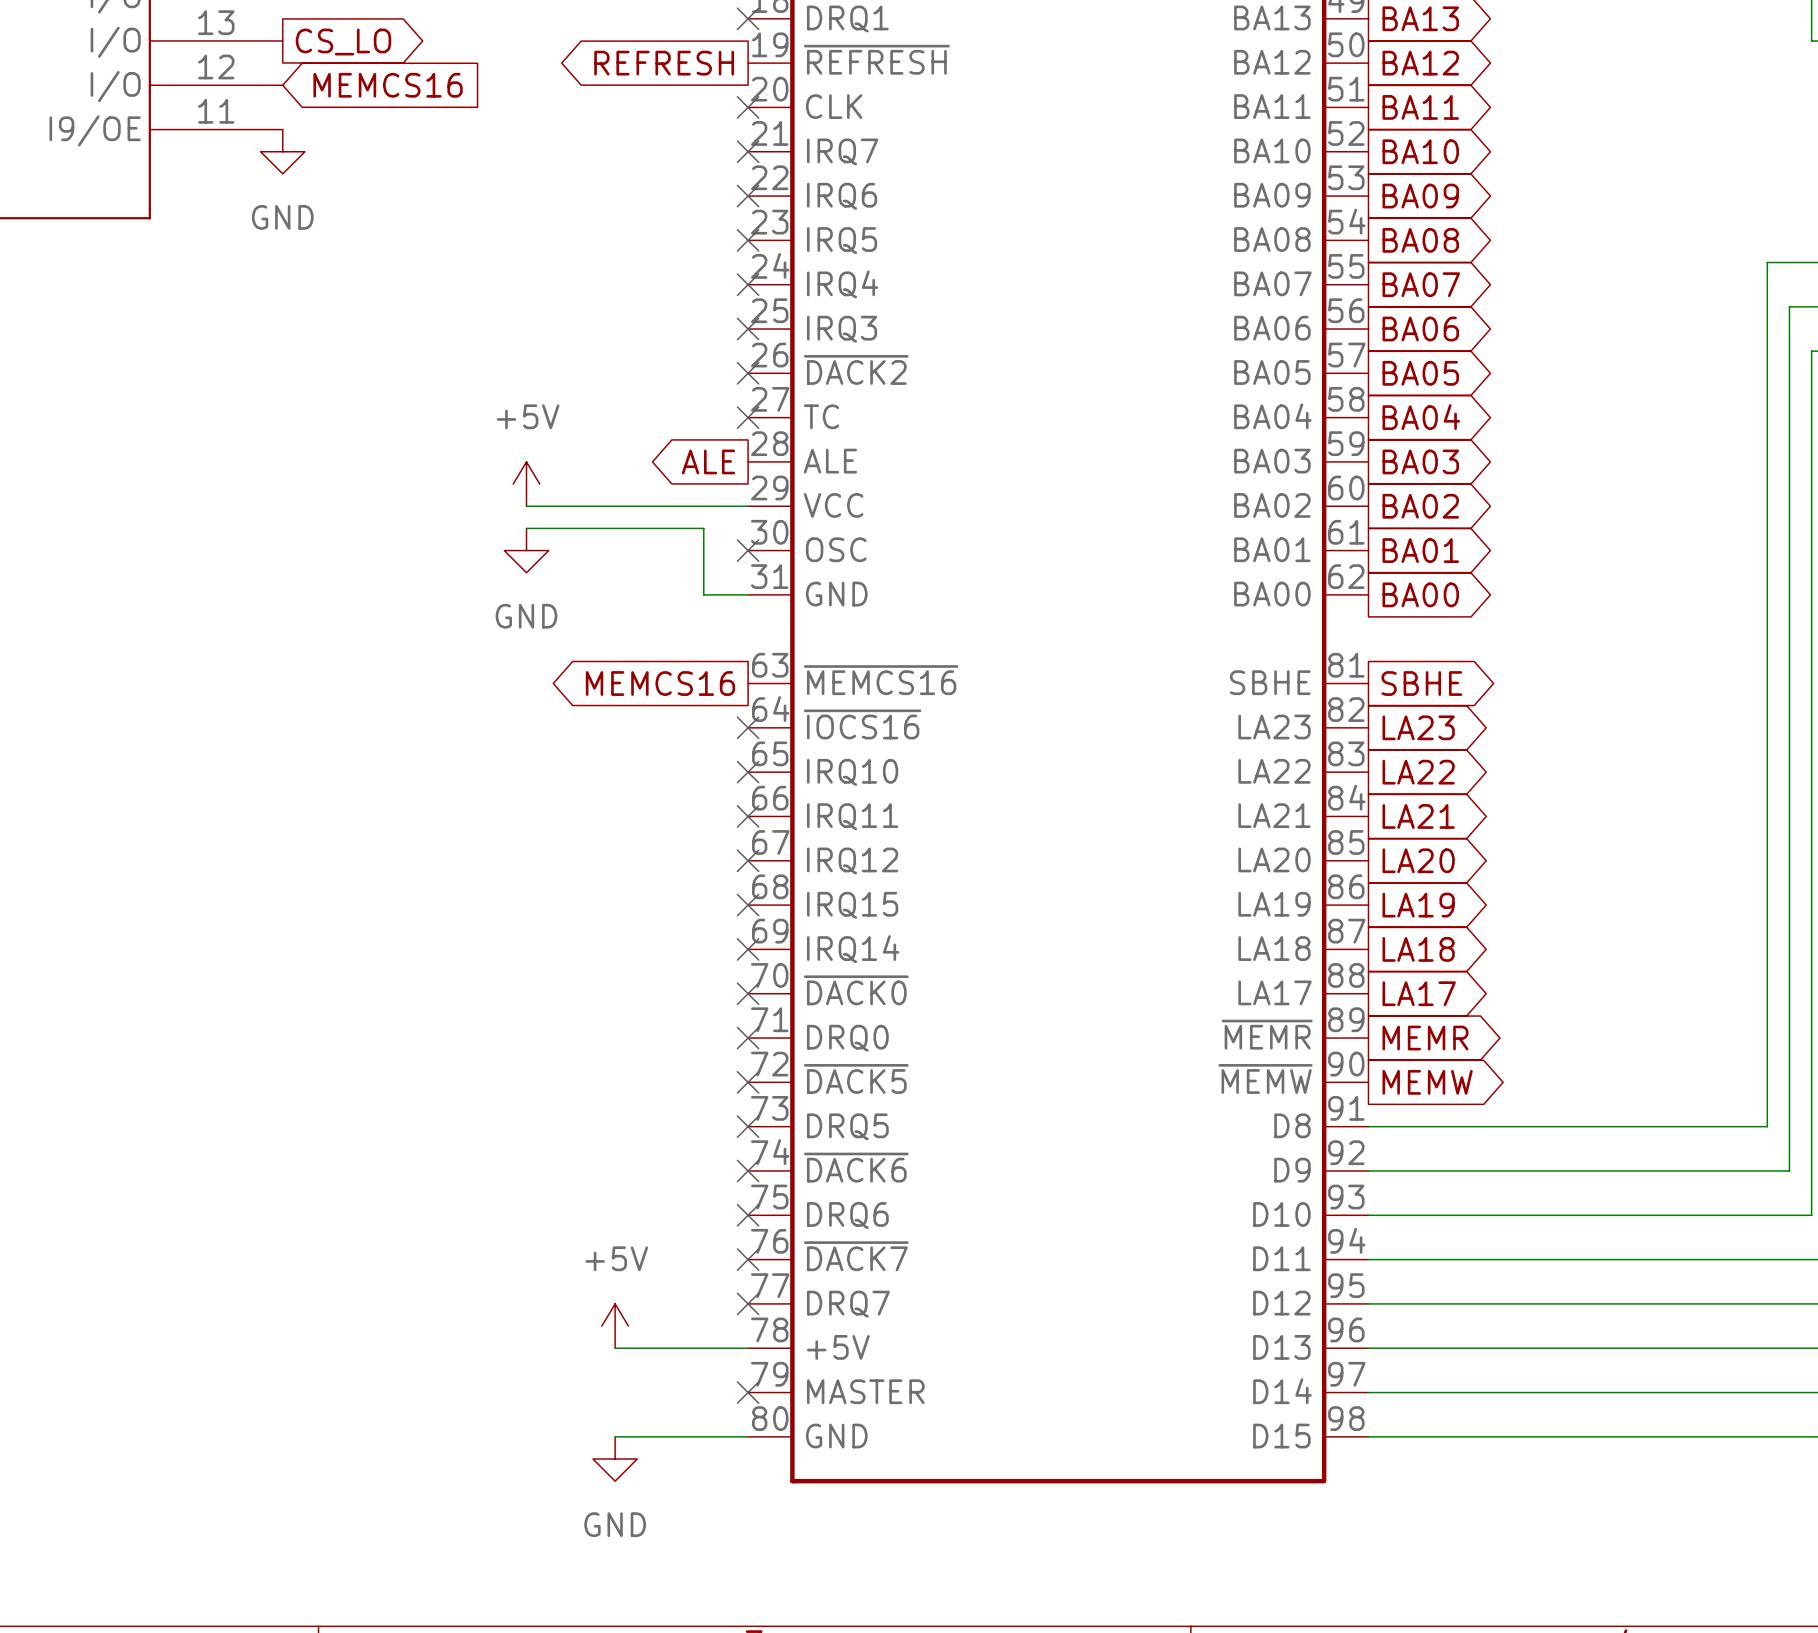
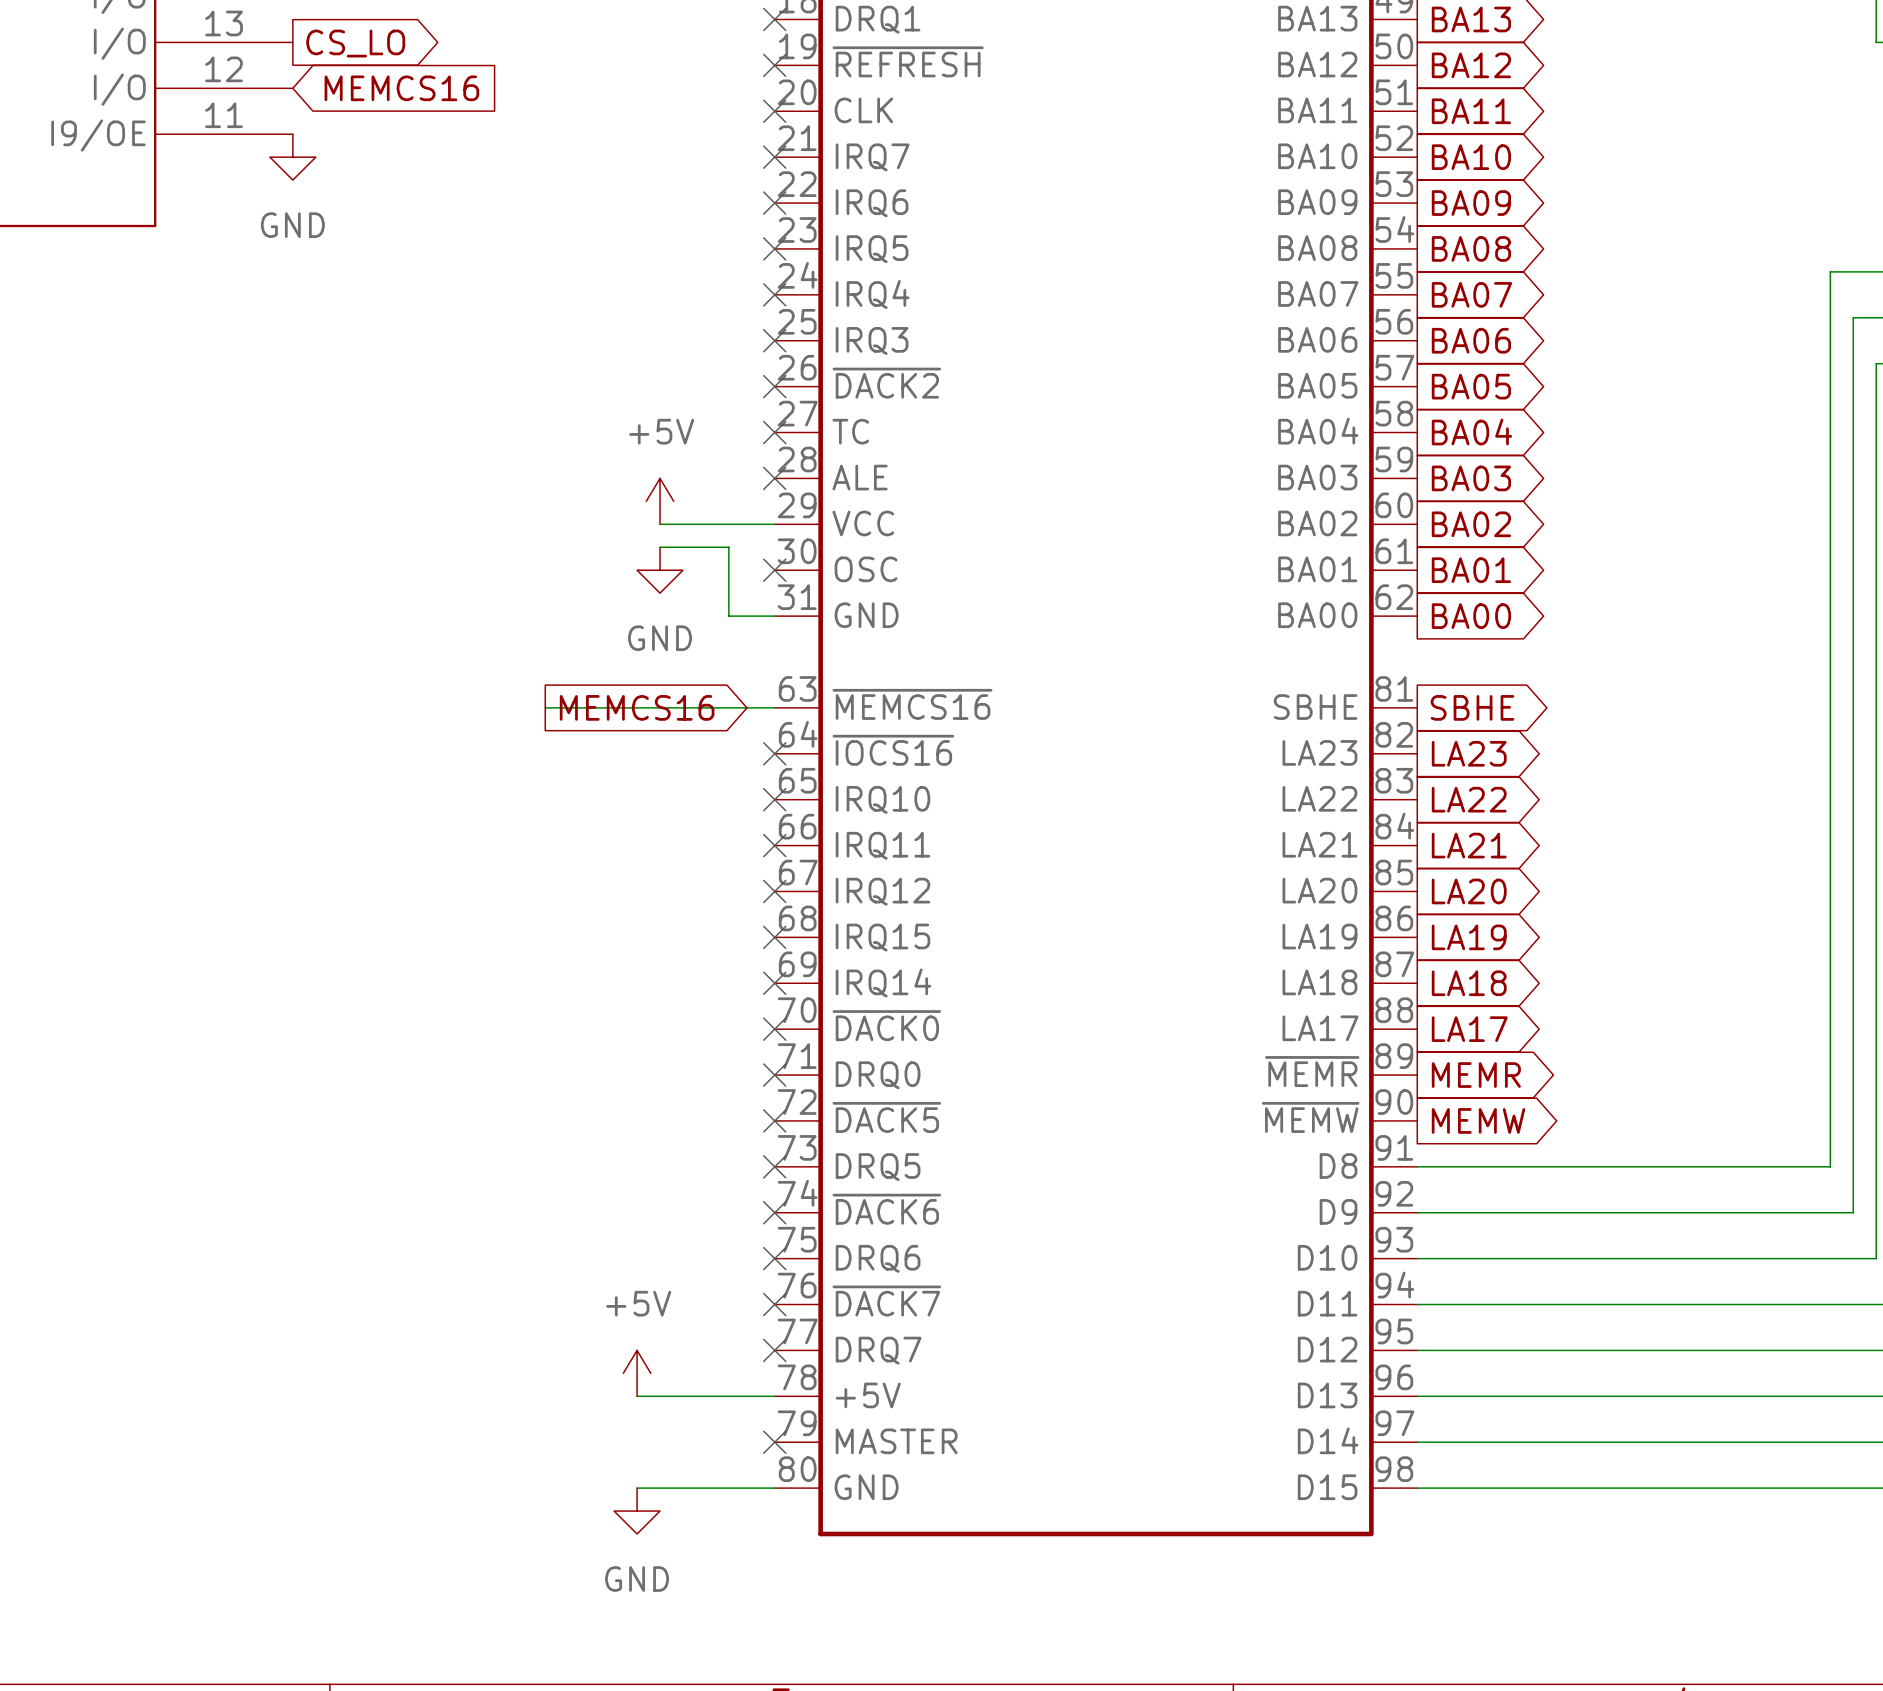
global label: REFRESH (664, 63) -> none
no-connect mark: none -> (774, 65)
global label: ALE (708, 461) -> none
no-connect mark: none -> (774, 478)
power symbol position: +5V (526, 484) -> +5V (660, 501)
wire: (526, 506) (637, 506) -> none
wire: (526, 528) (637, 528) -> none
power symbol position: GND (526, 550) -> GND (660, 570)
wire: none -> (545, 707) (774, 707)
global label rotation: 0° (660, 683) -> 180° (637, 707)

